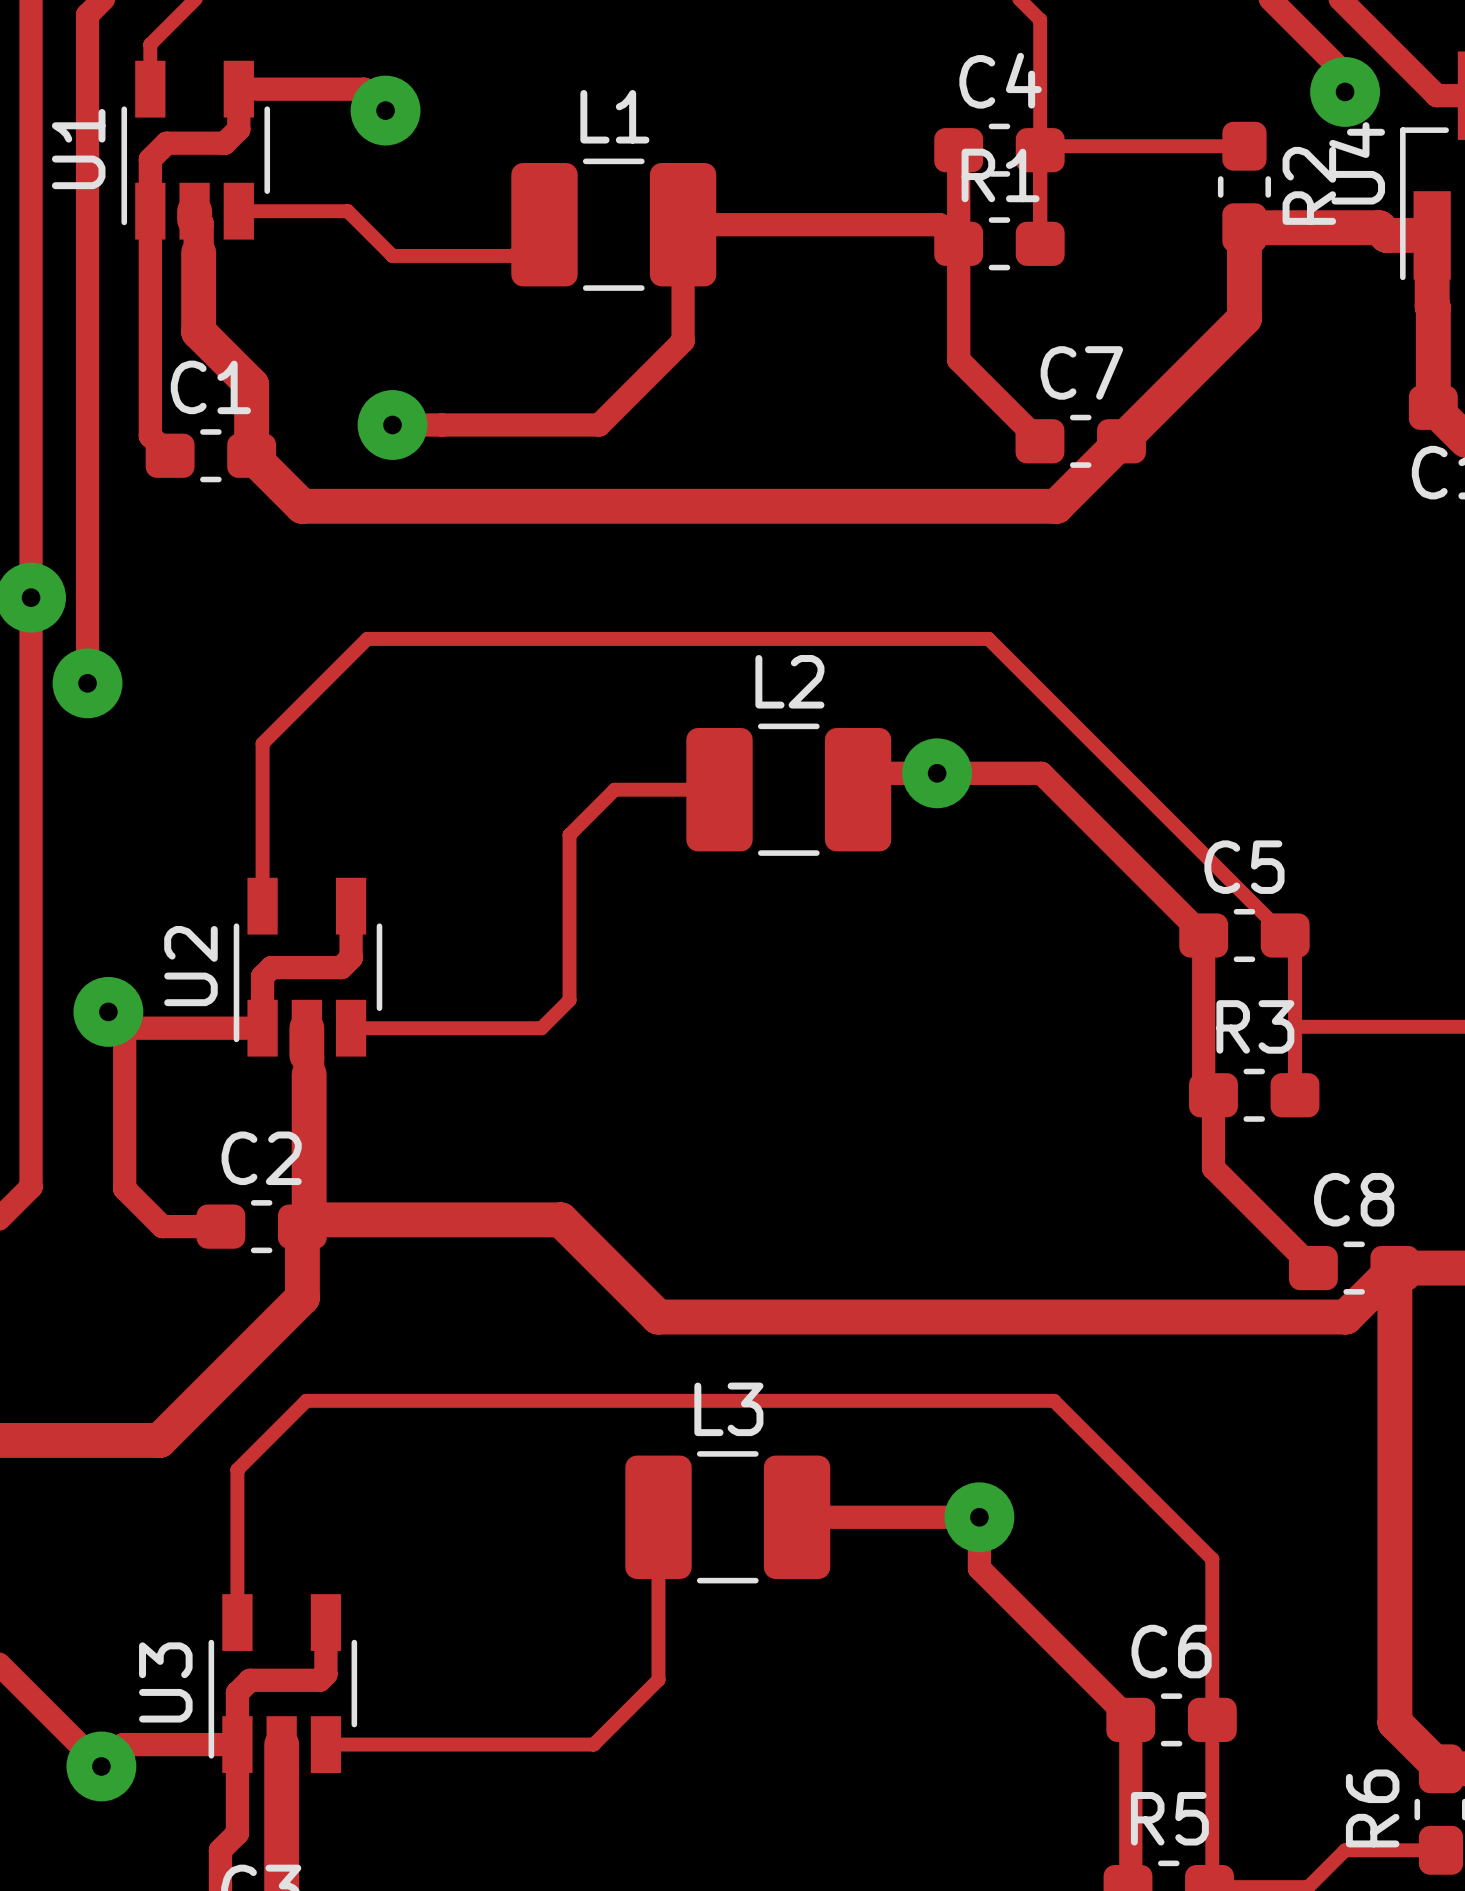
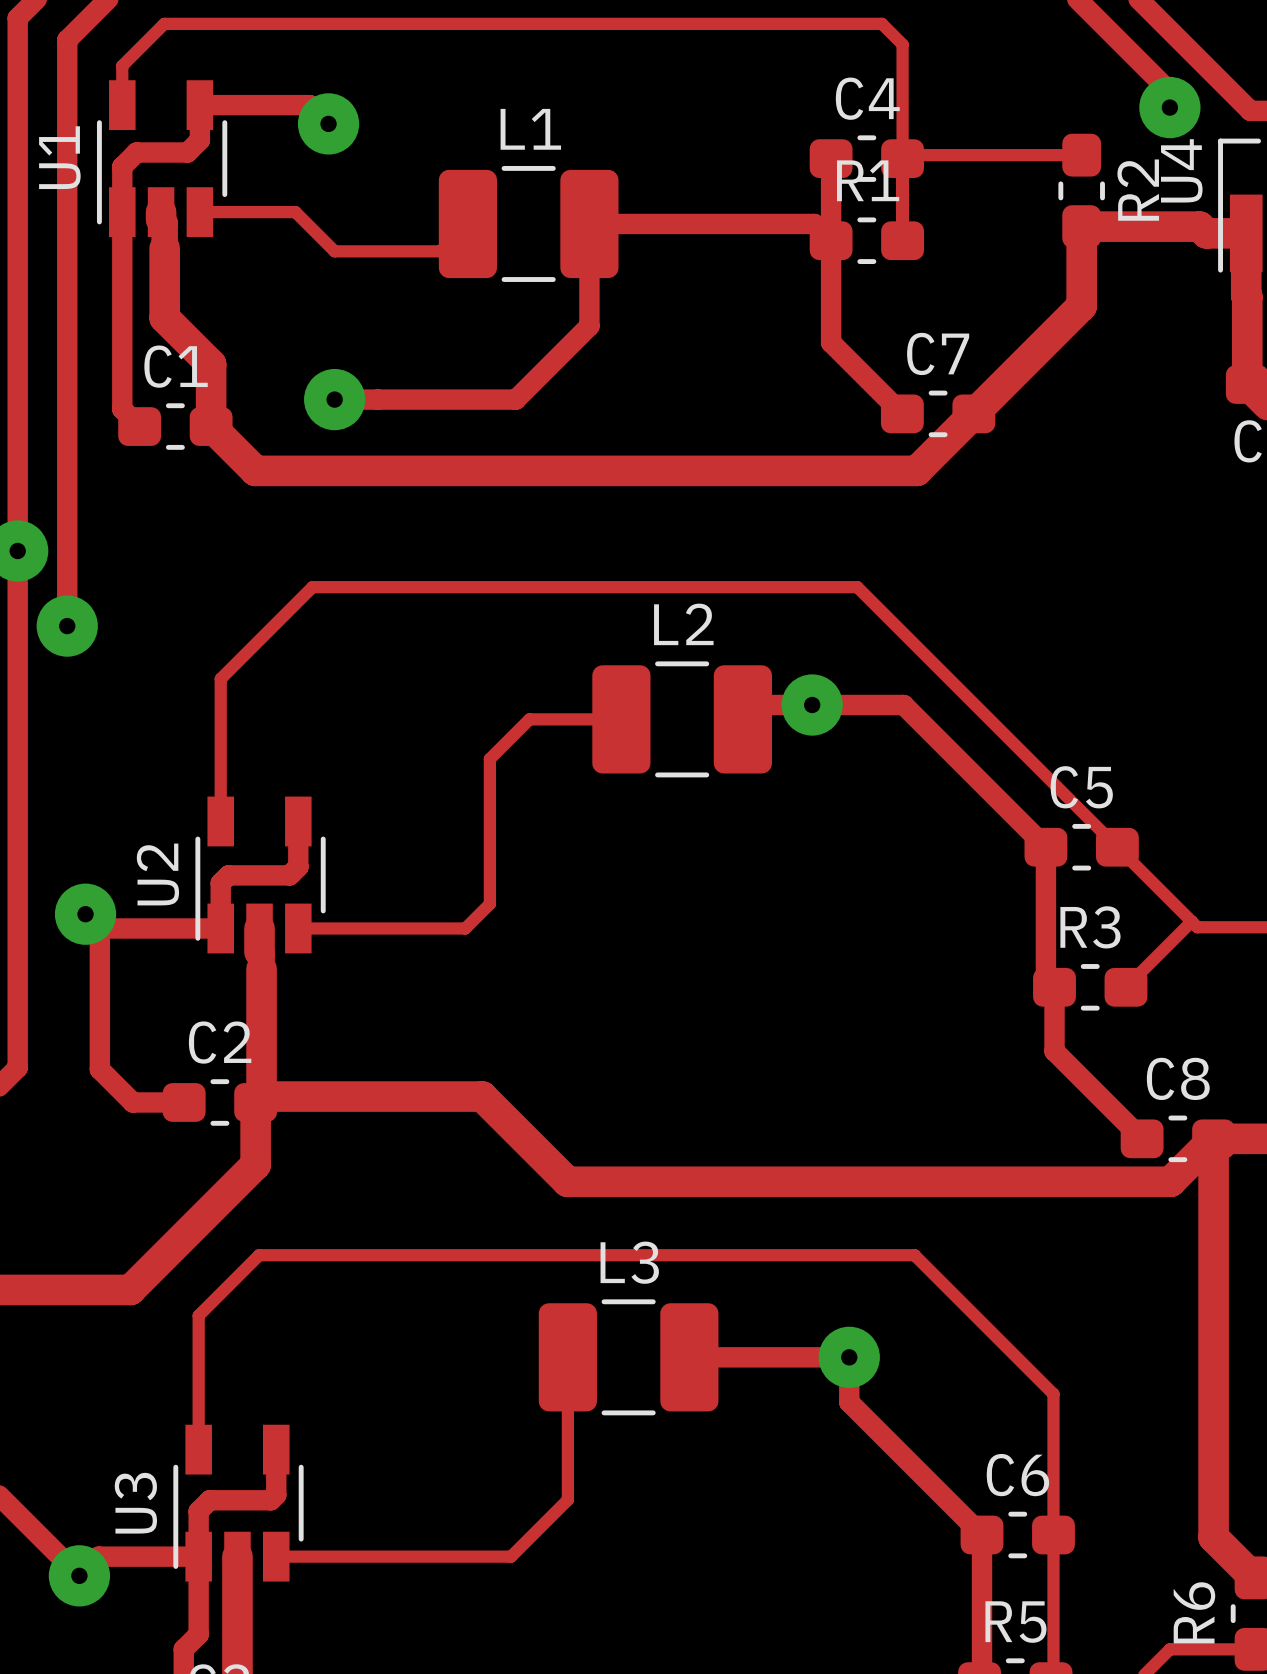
track: (1295, 945) (1295, 1095) -> (1191, 921) (1125, 987)
track: (1295, 1026) (1376, 1026) -> (1125, 855) (1197, 927)

